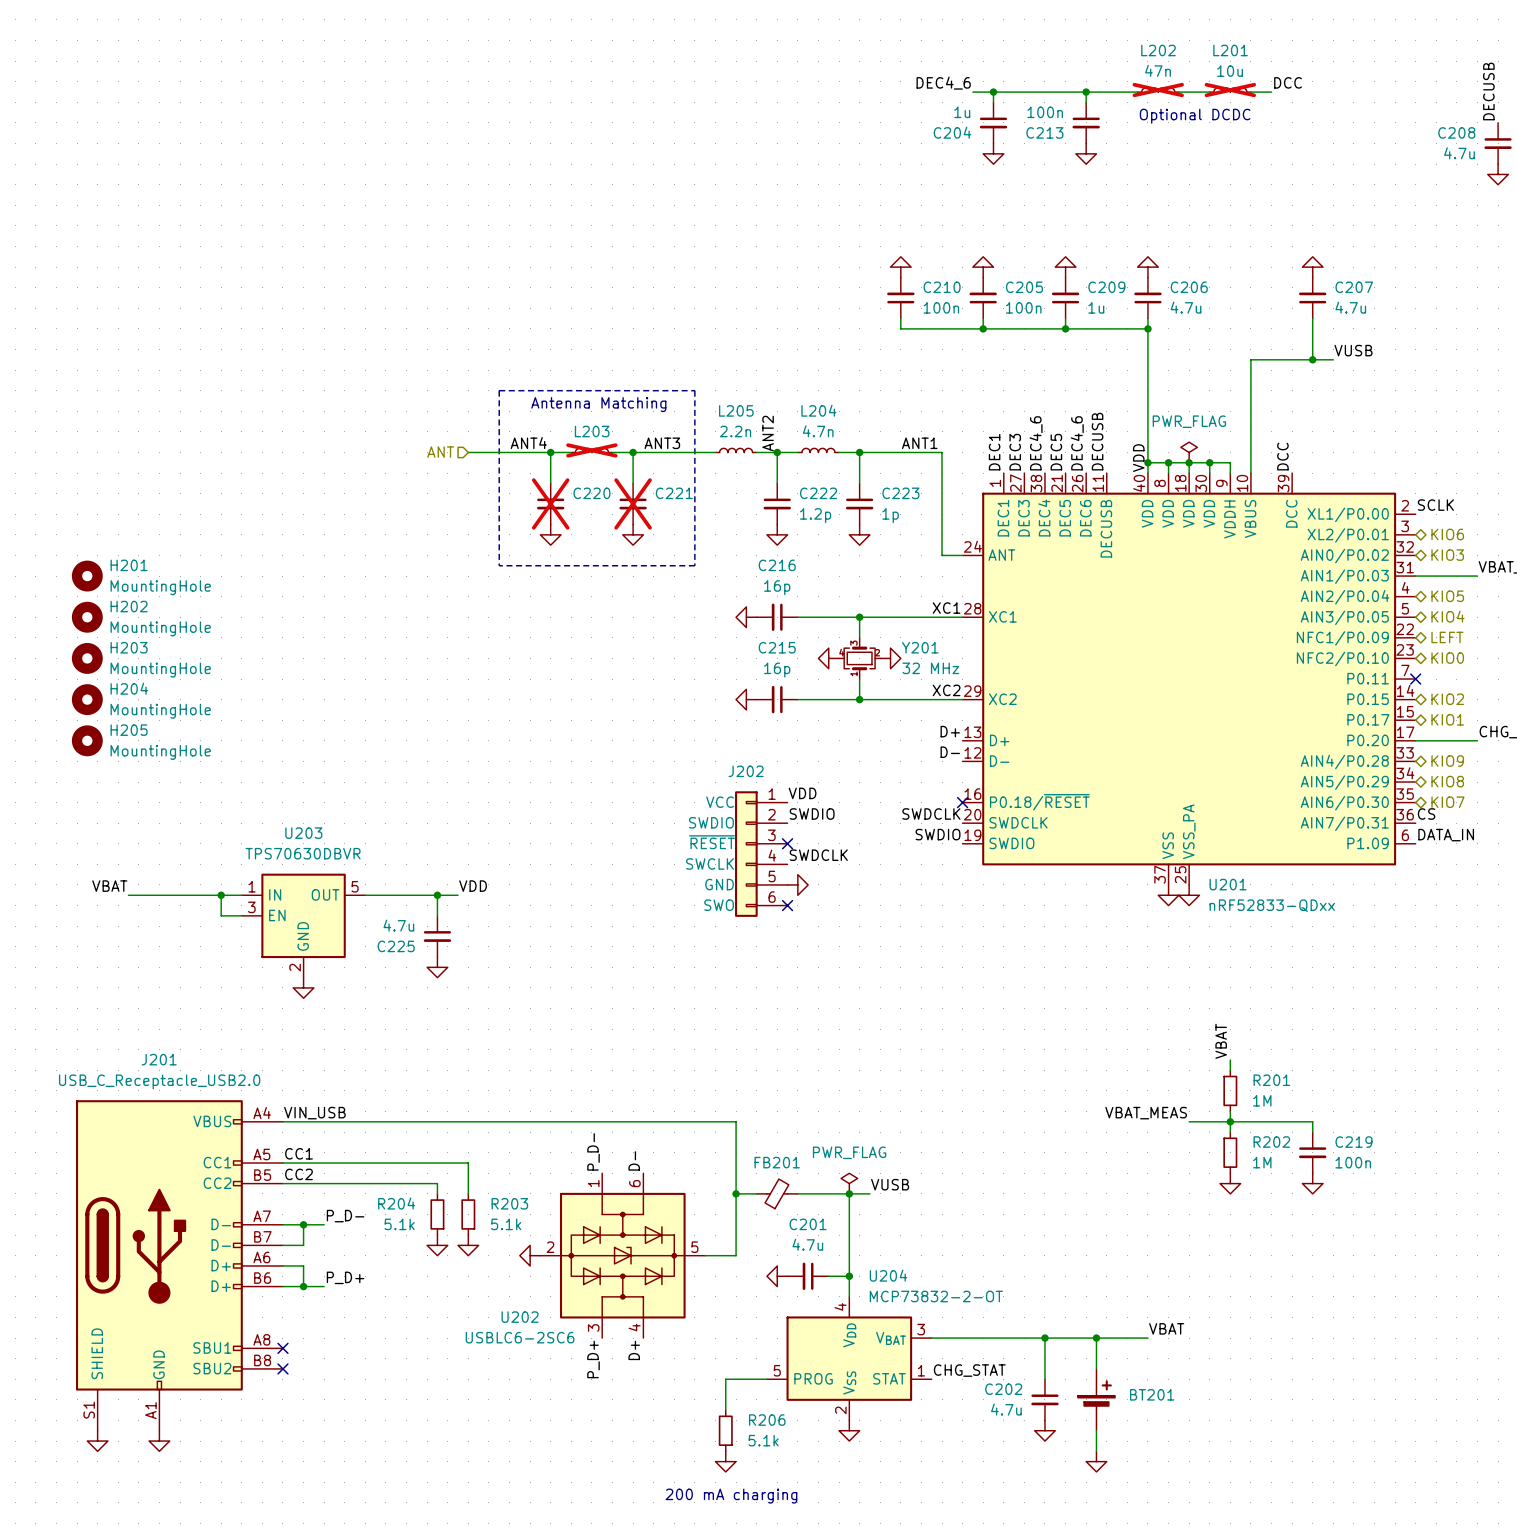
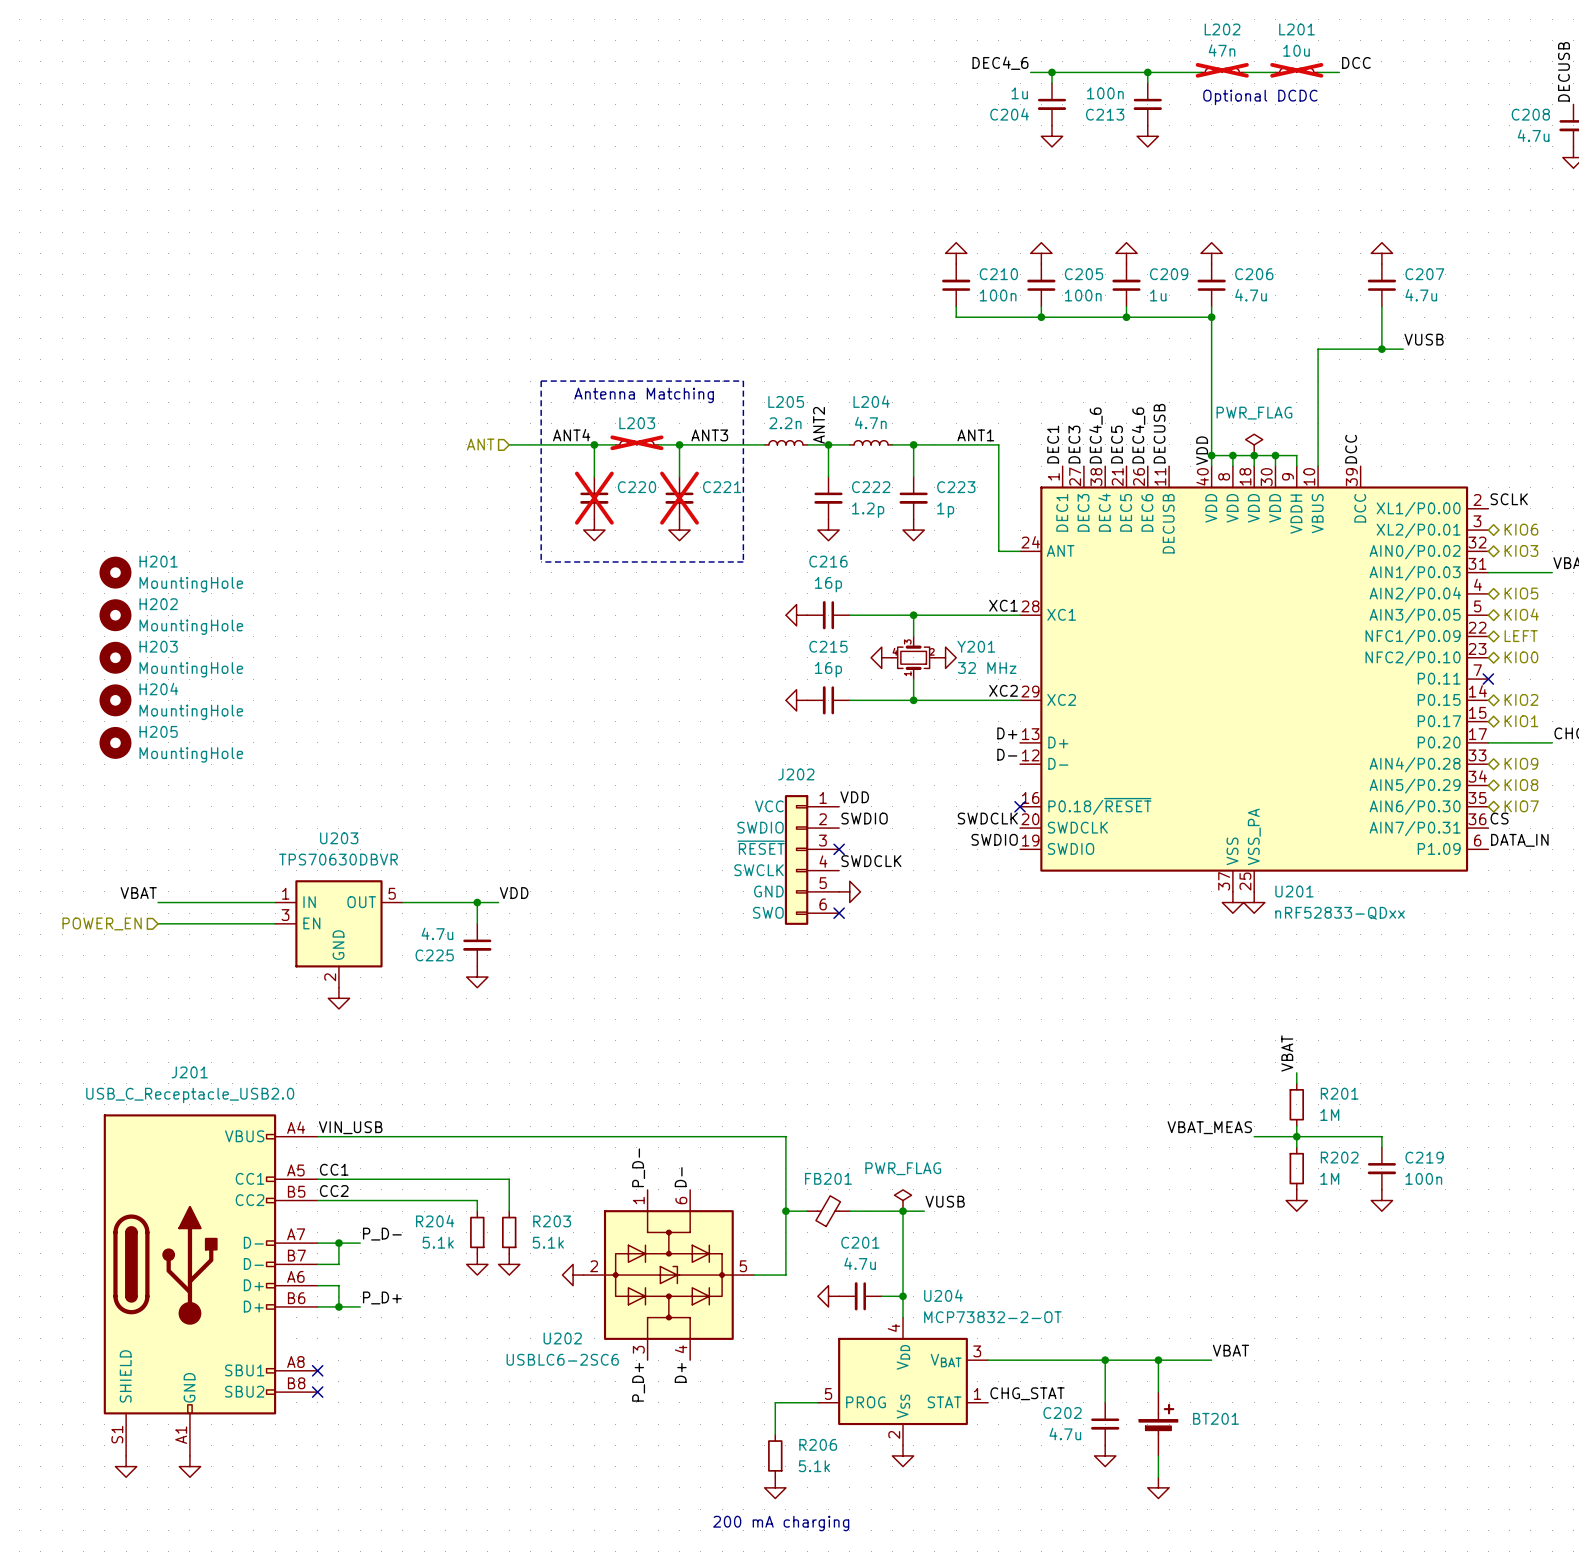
wire: (221, 895) (221, 915) -> (158, 923) (253, 923)
junction: (221, 895) -> none
hierarchical label: none -> POWER_EN (102, 923)

